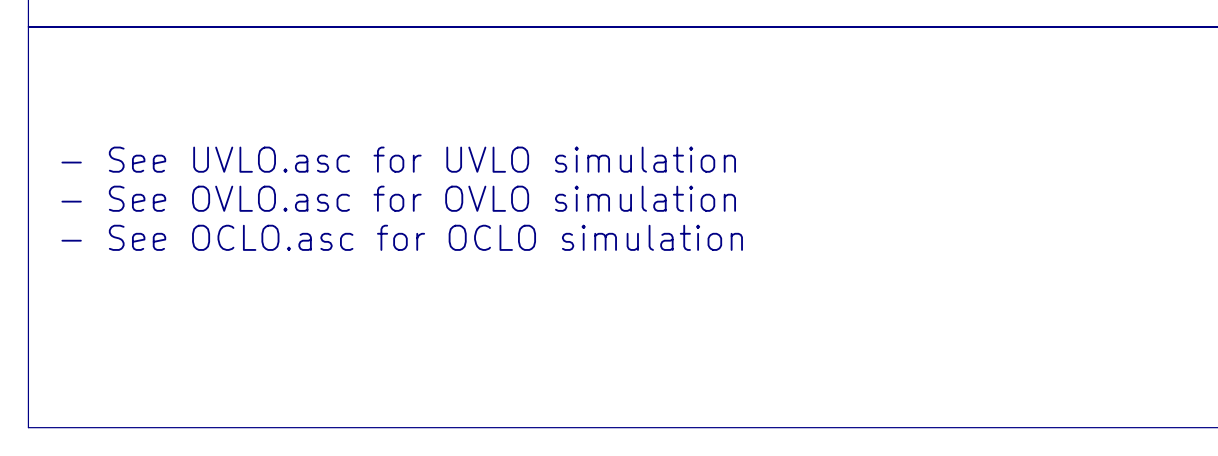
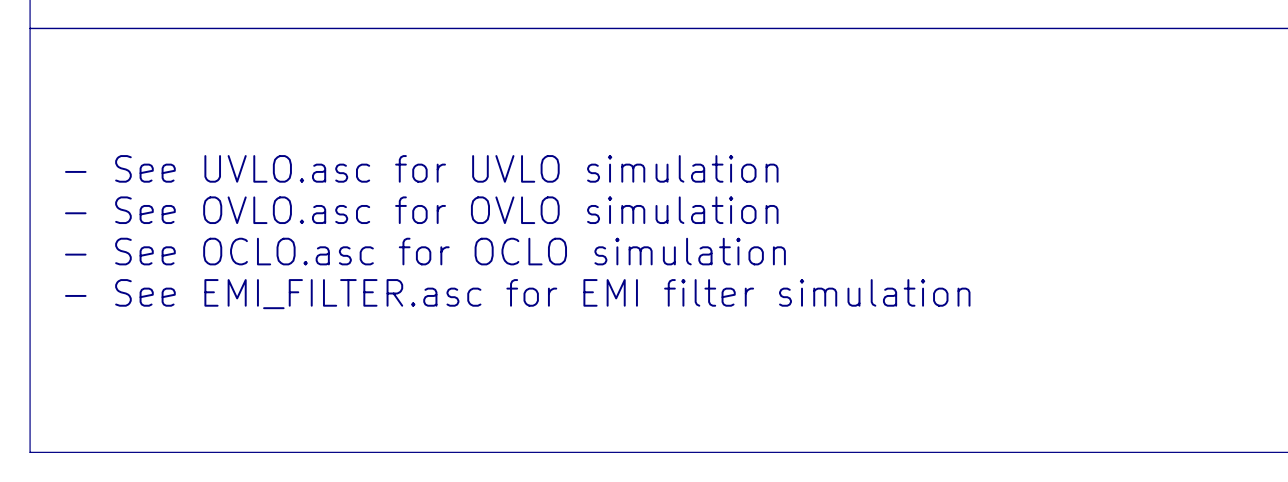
text: none -> - See EMI_FILTER.asc for EMI filter simulation (517, 294)

